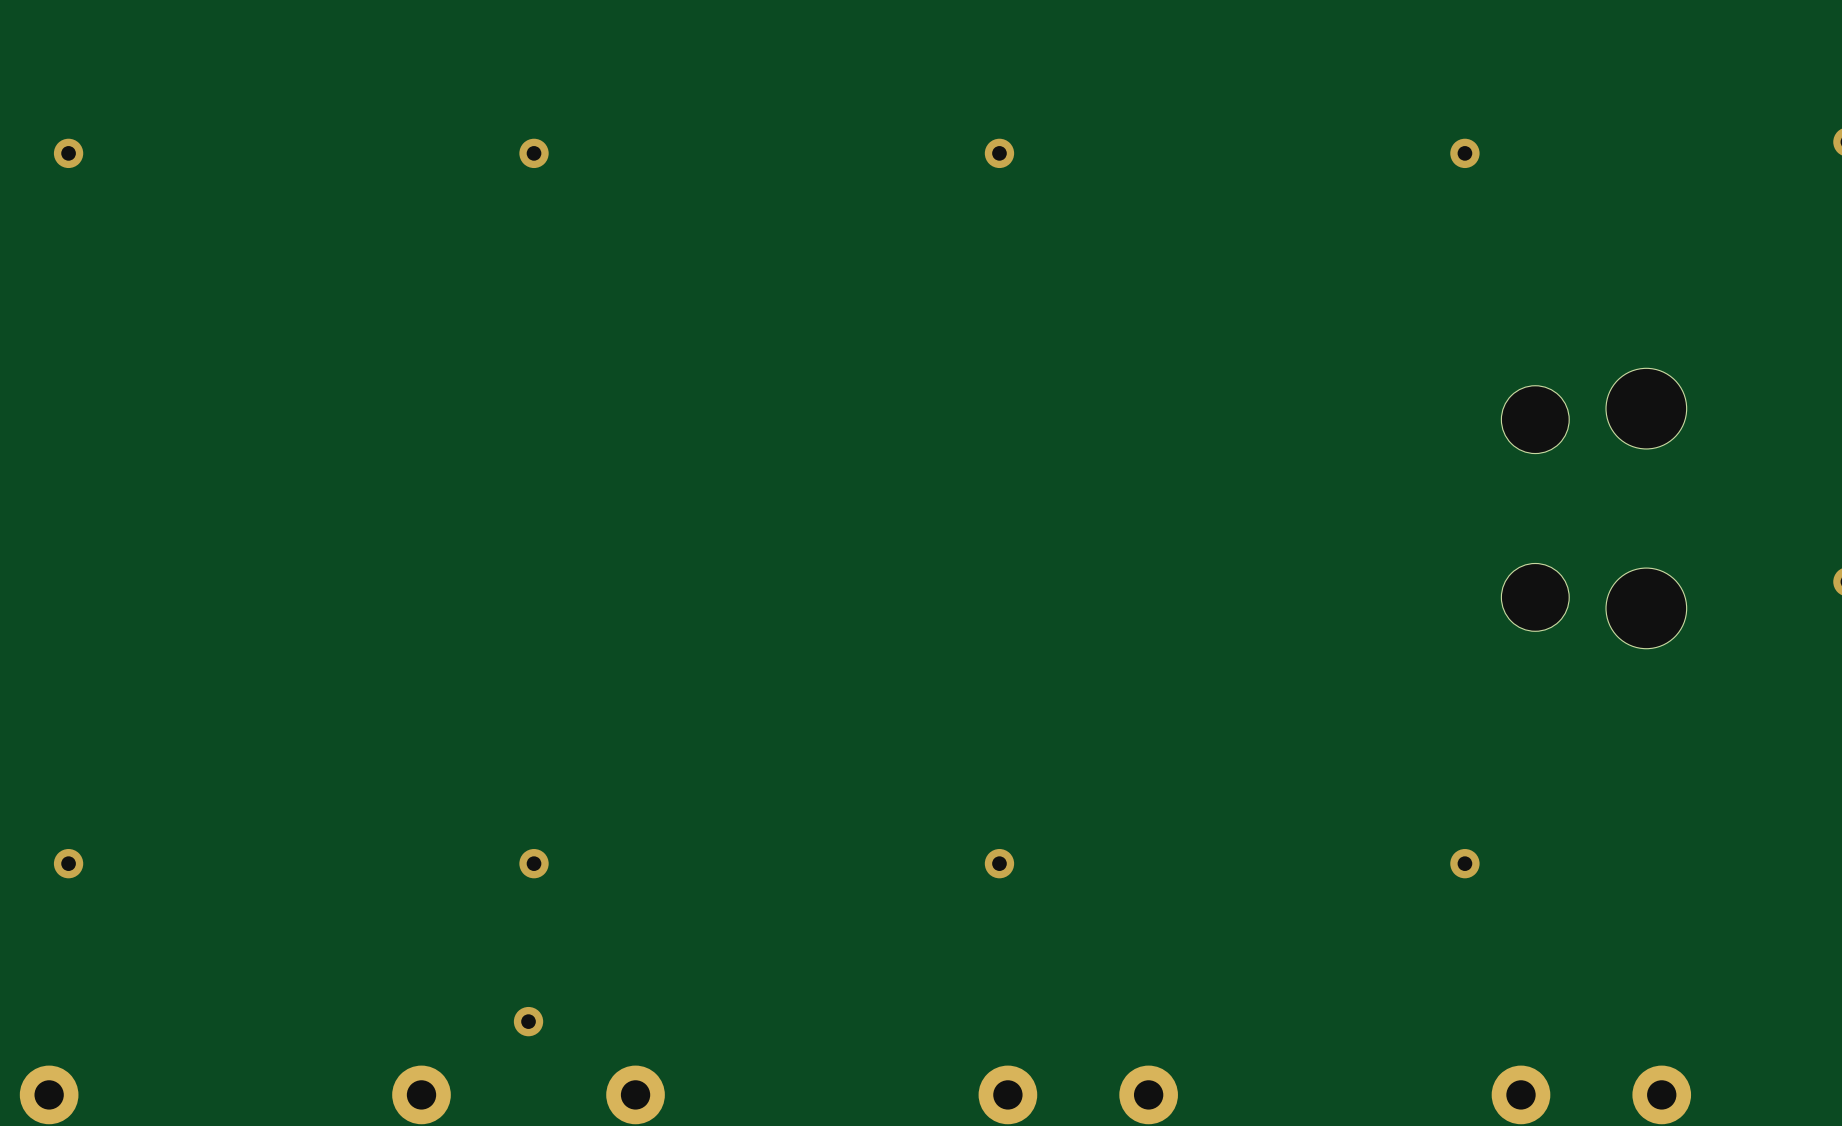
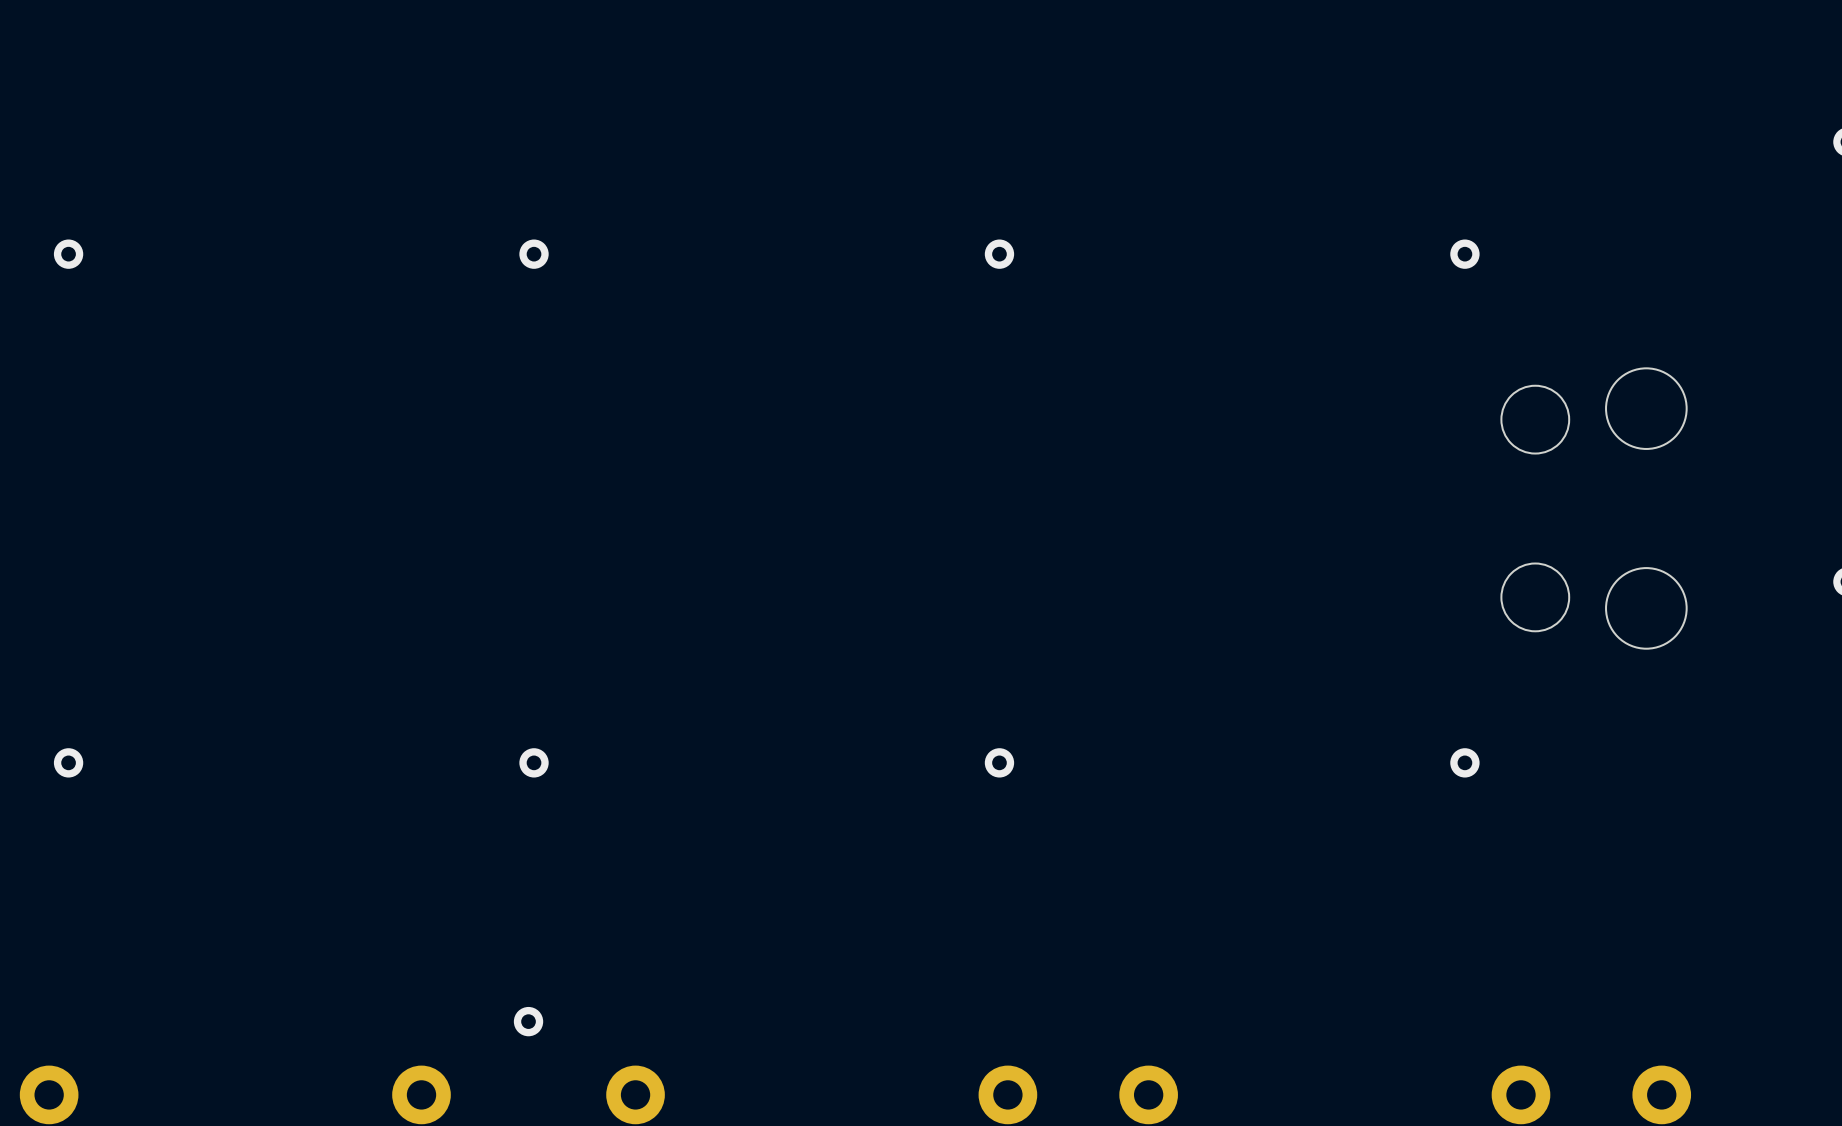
via position: (68, 153) -> (68, 254)
via position: (534, 153) -> (534, 254)
via position: (999, 153) -> (999, 254)
via position: (1464, 153) -> (1464, 254)
via position: (68, 863) -> (68, 762)
via position: (534, 863) -> (534, 762)
via position: (999, 863) -> (999, 762)
via position: (1464, 863) -> (1464, 762)

